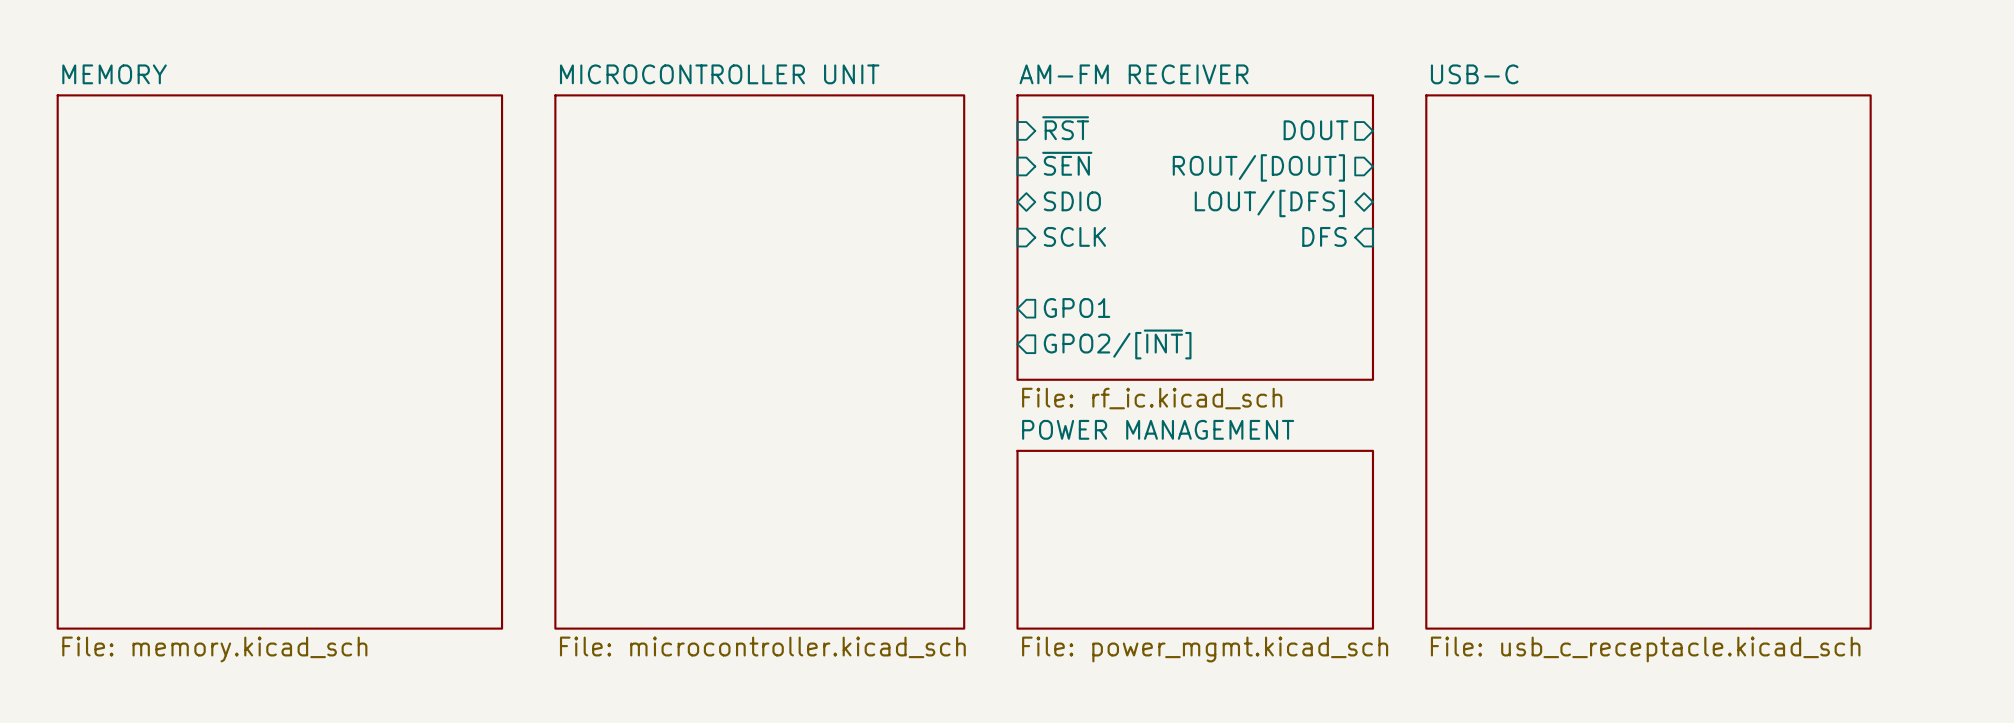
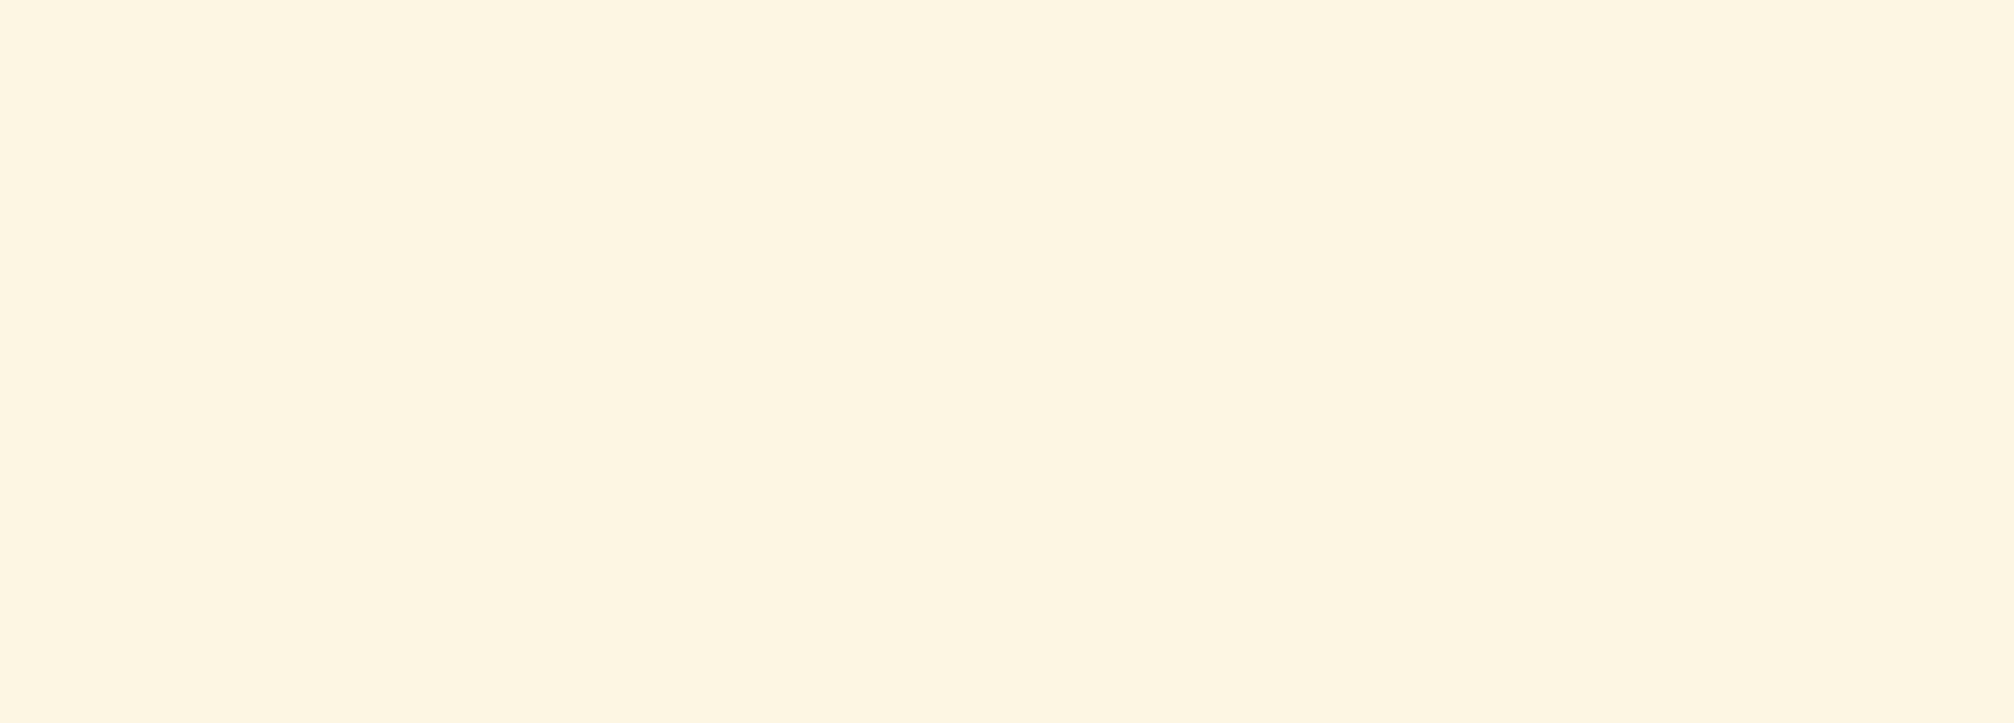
sheet pin: ~{RST} (1065, 128) -> none
sheet pin: DOUT (1316, 130) -> none
sheet pin: ~{SEN} (1067, 163) -> none
sheet pin: ROUT/[DOUT] (1258, 167) -> none
sheet pin: SDIO (1072, 201) -> none
sheet pin: LOUT/[DFS] (1269, 203) -> none
sheet pin: SCLK (1074, 236) -> none
sheet pin: DFS (1324, 236) -> none
sheet AM-FM RECEIVER: File: rf_ic.kicad_sch (1195, 237) -> none
sheet pin: GPO1 (1077, 308) -> none
sheet pin: GPO2/[~{INT}] (1117, 344) -> none
sheet MEMORY: File: memory.kicad_sch (279, 361) -> none
sheet MICROCONTROLLER UNIT: File: microcontroller.kicad_sch (759, 361) -> none
sheet USB-C: File: usb_c_receptacle.kicad_sch (1648, 361) -> none
sheet POWER MANAGEMENT: File: power_mgmt.kicad_sch (1195, 539) -> none

